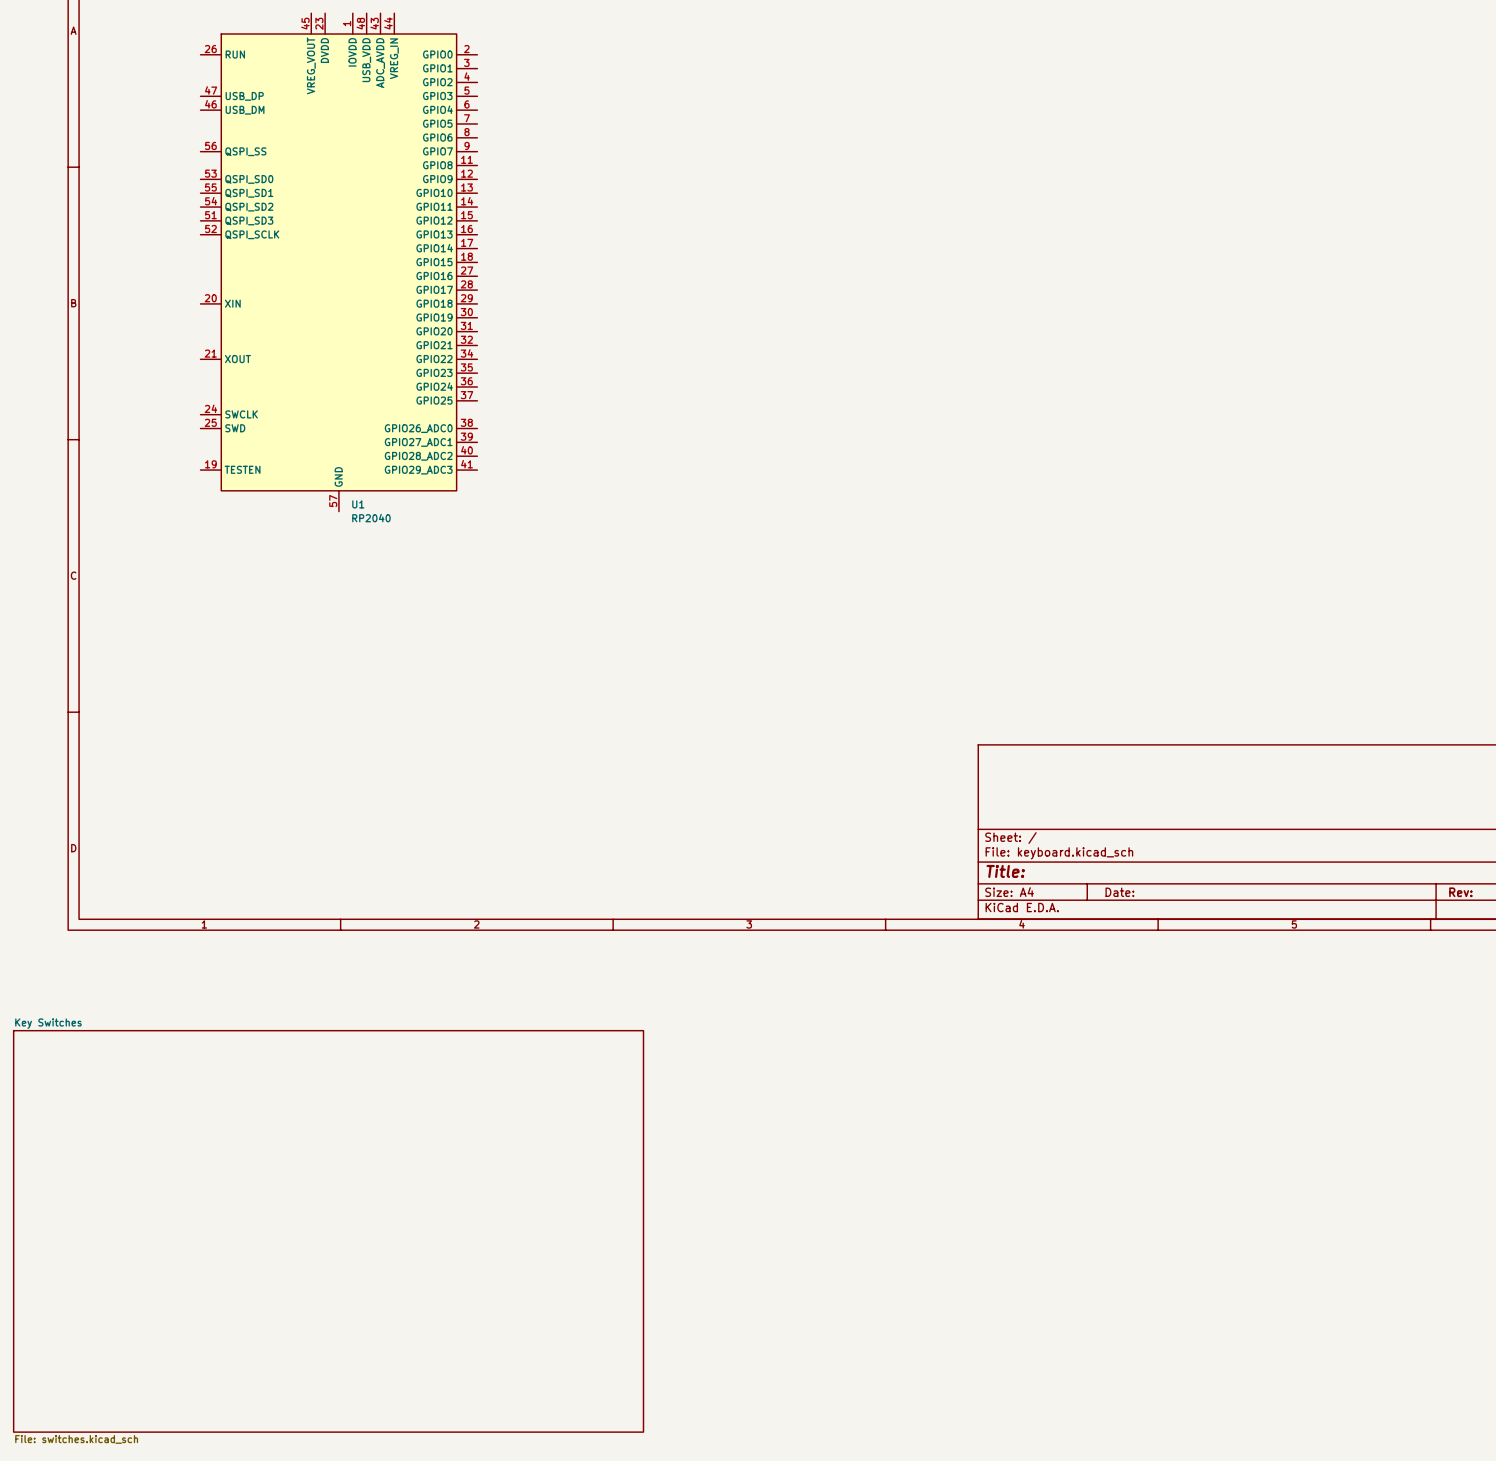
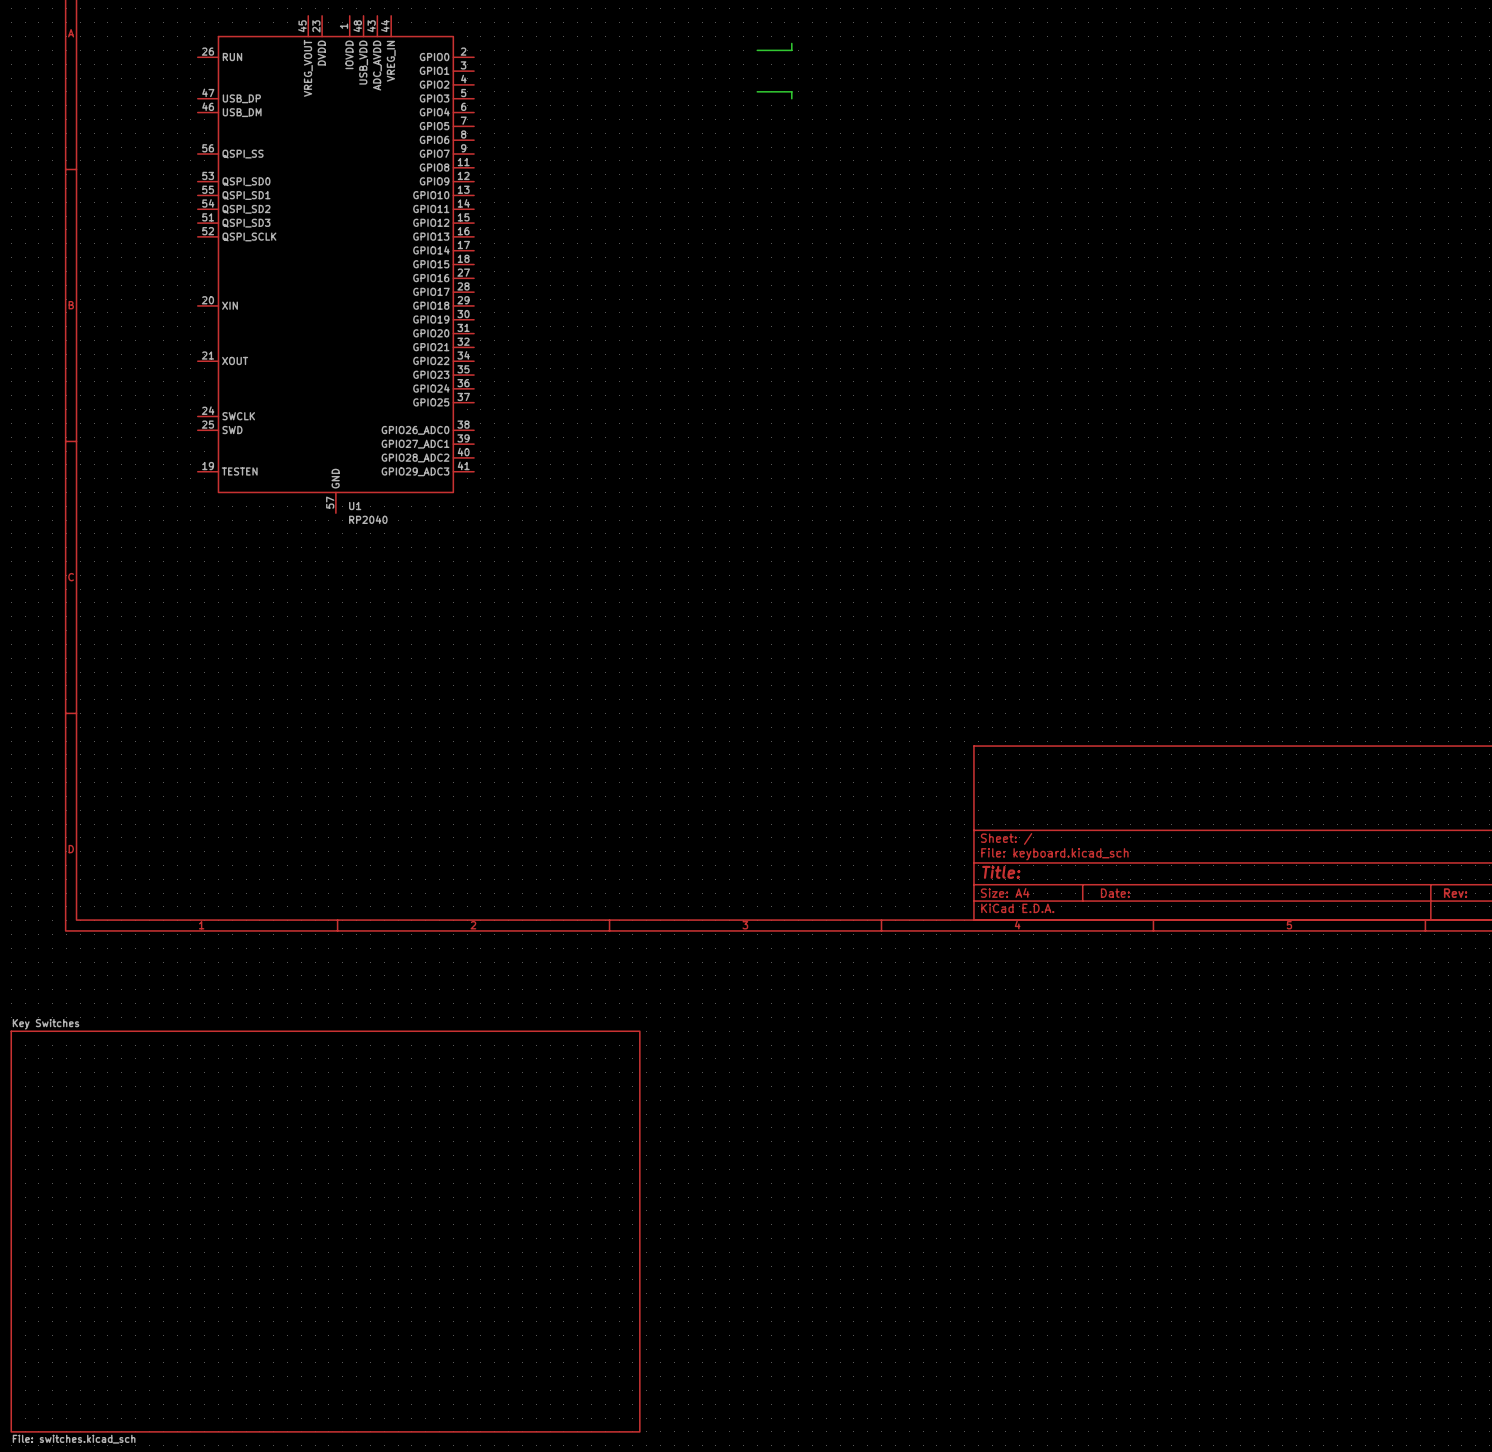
wire: none -> (791, 43) (791, 50) (757, 50)
wire: none -> (757, 91) (791, 91) (791, 98)

